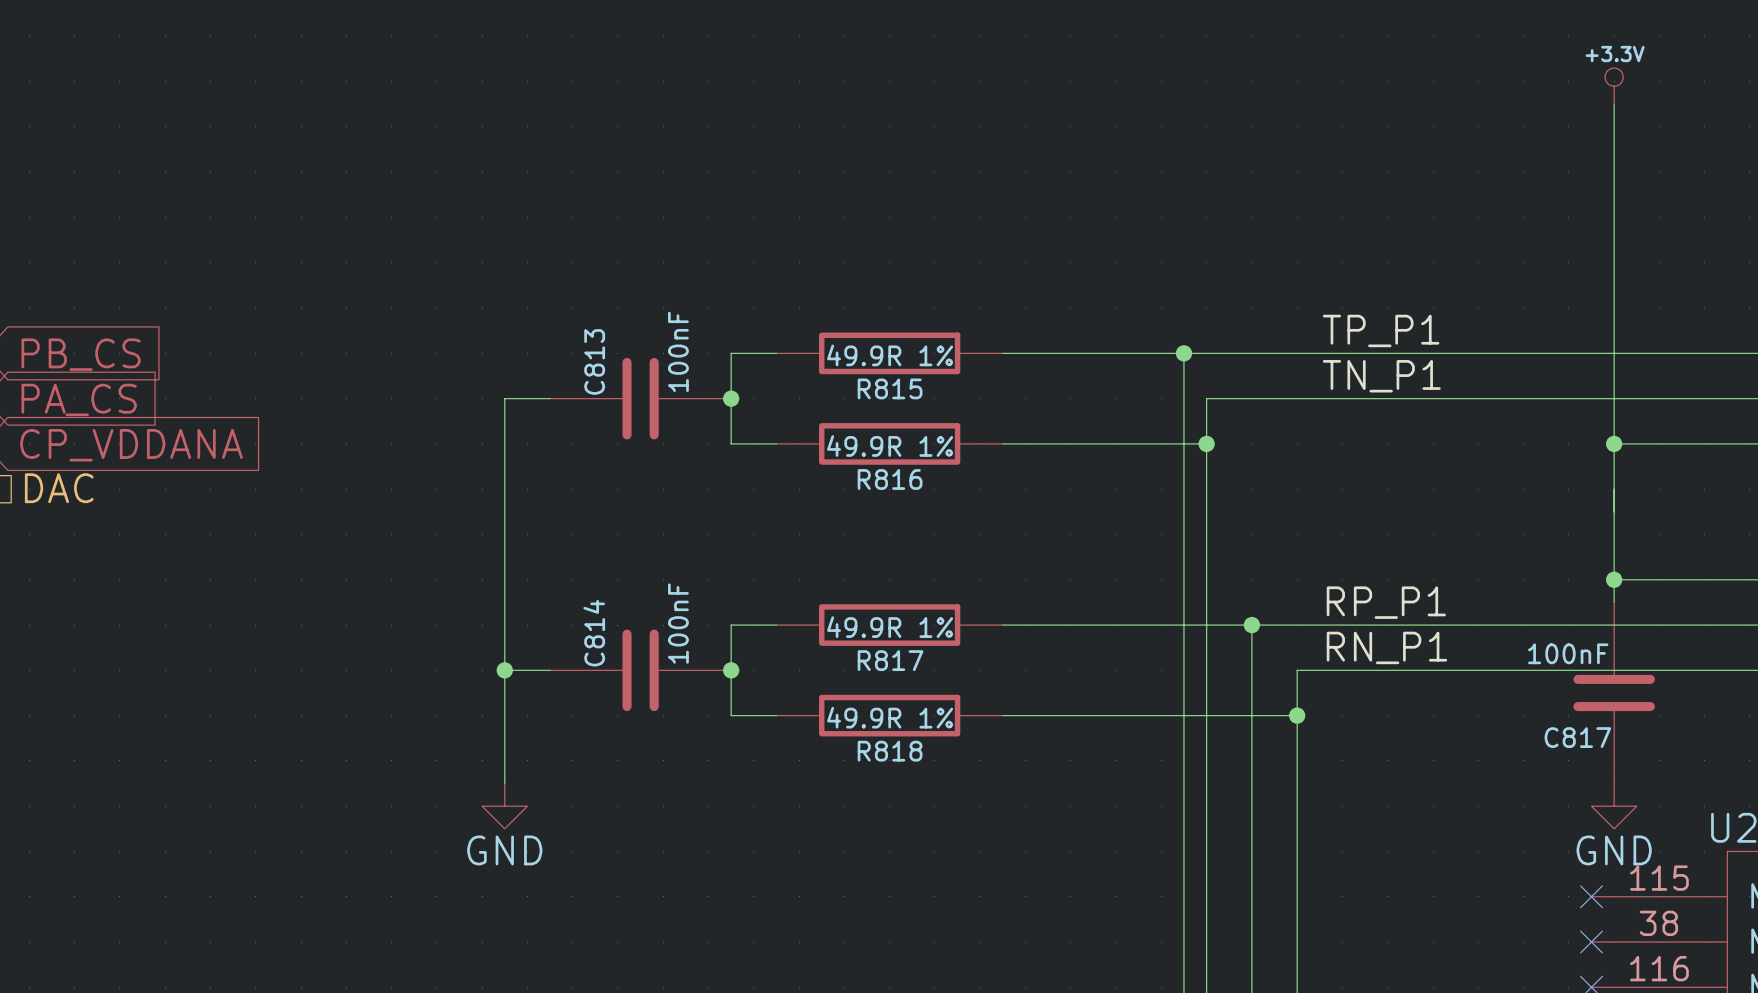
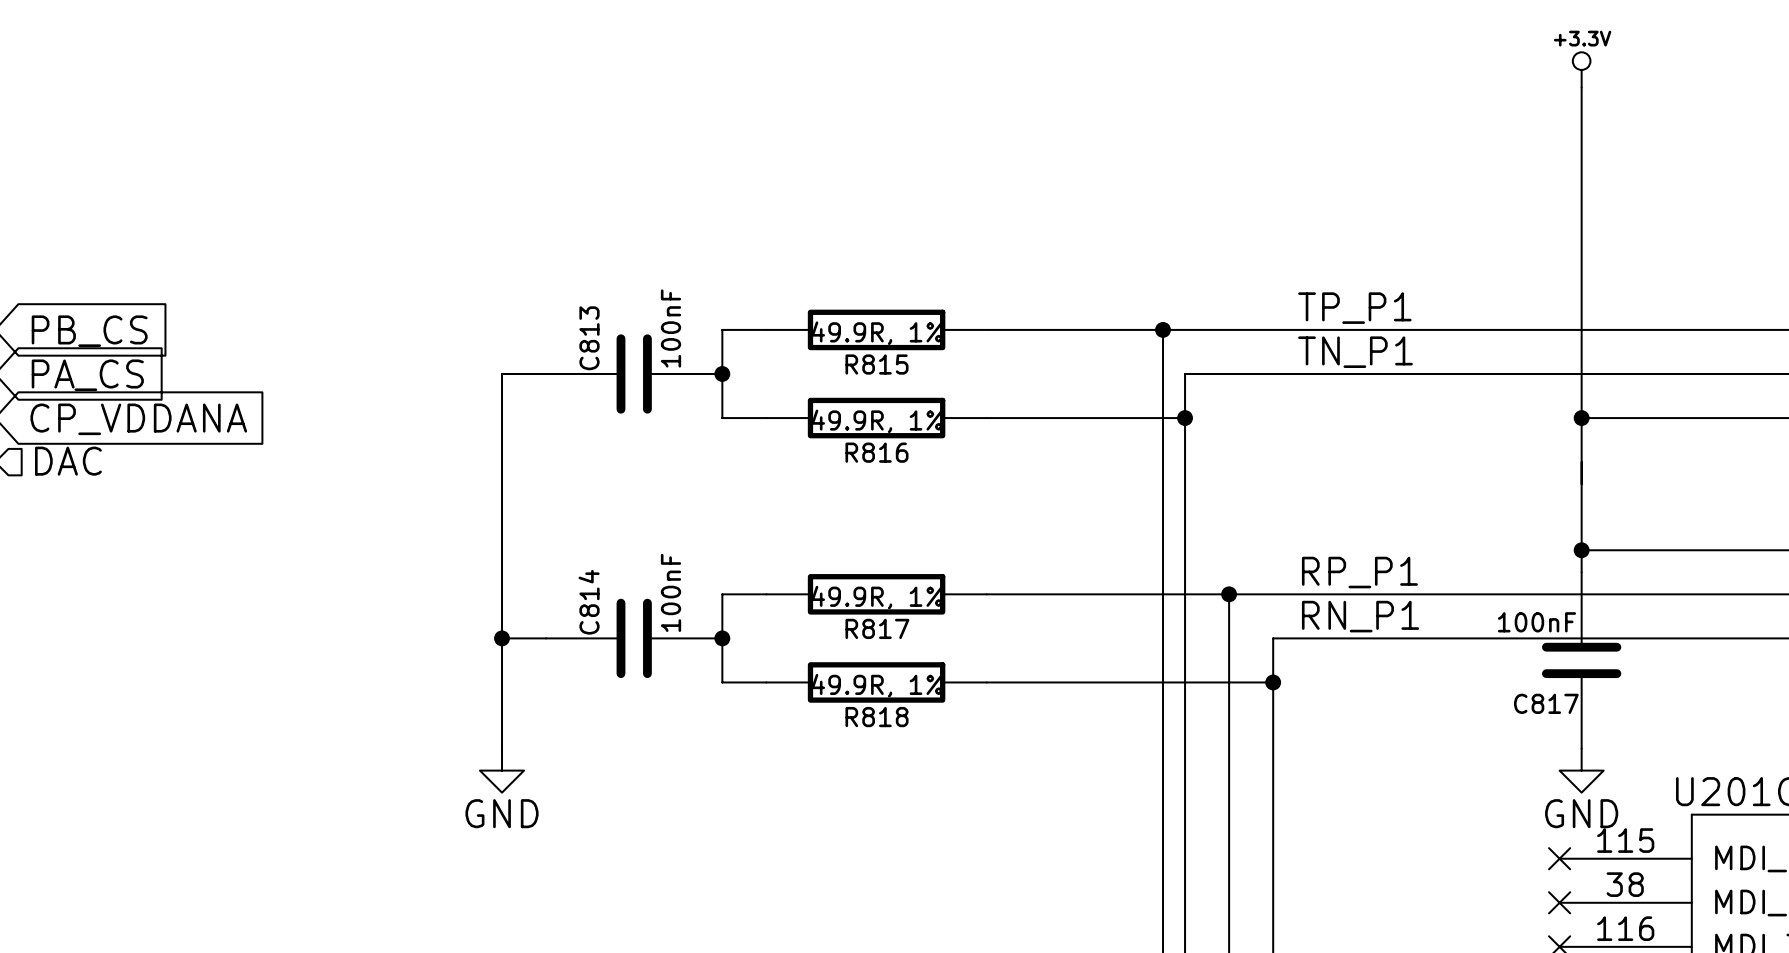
R815 value: 49.9R 1% (890, 355) -> 49.9R, 1% (877, 333)
R816 value: 49.9R 1% (890, 446) -> 49.9R, 1% (877, 421)
R817 value: 49.9R 1% (890, 627) -> 49.9R, 1% (877, 597)
R818 value: 49.9R 1% (890, 717) -> 49.9R, 1% (877, 685)

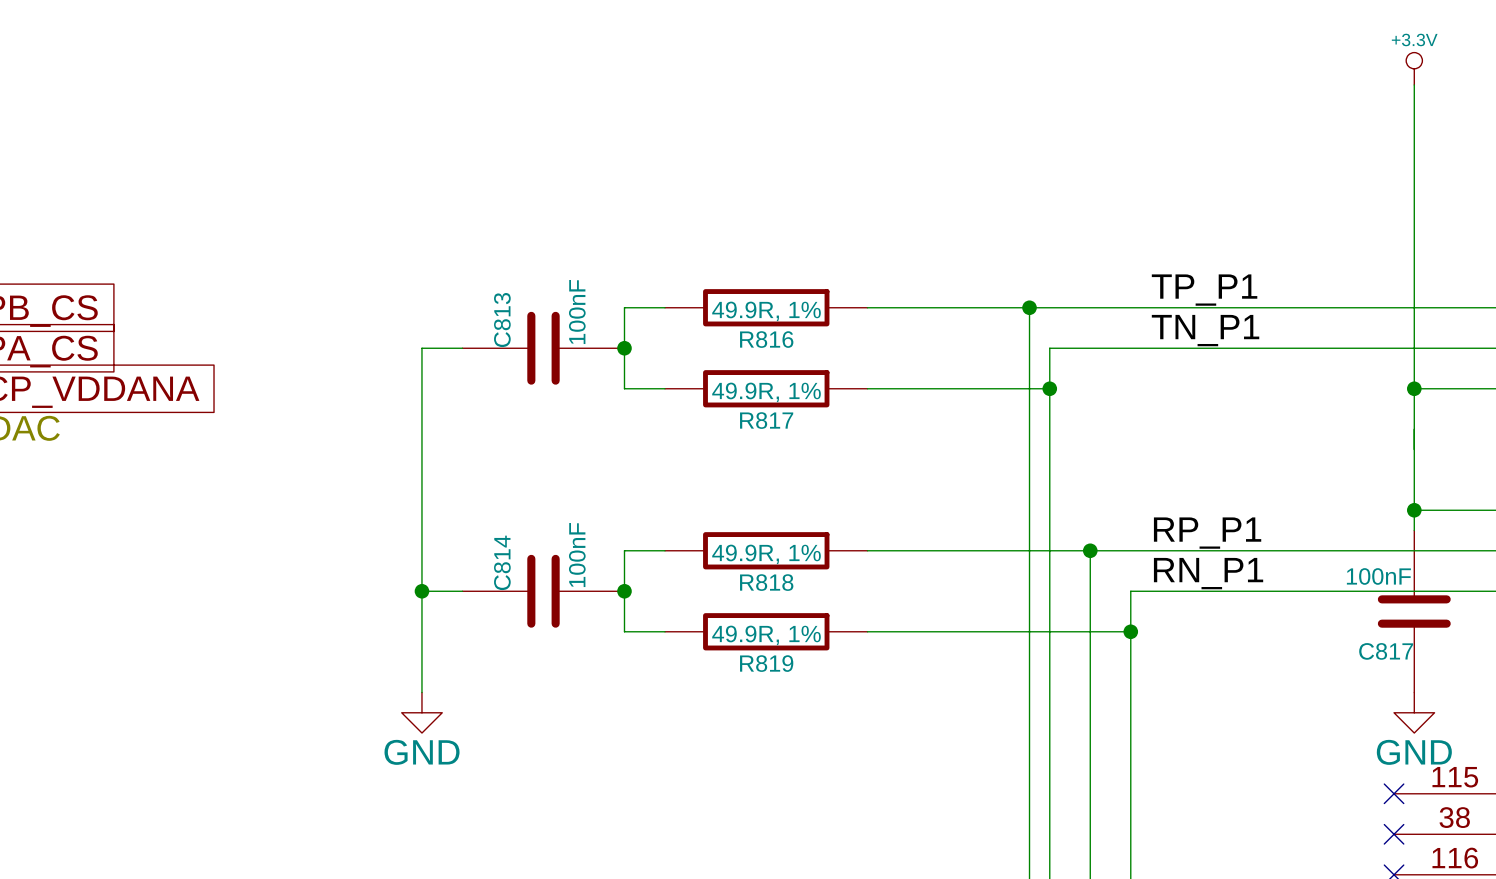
R815 name: R815 (877, 364) -> R816 (766, 339)
R816 name: R816 (877, 452) -> R817 (766, 420)
R817 name: R817 (877, 628) -> R818 (766, 582)
R818 name: R818 (877, 717) -> R819 (766, 663)

